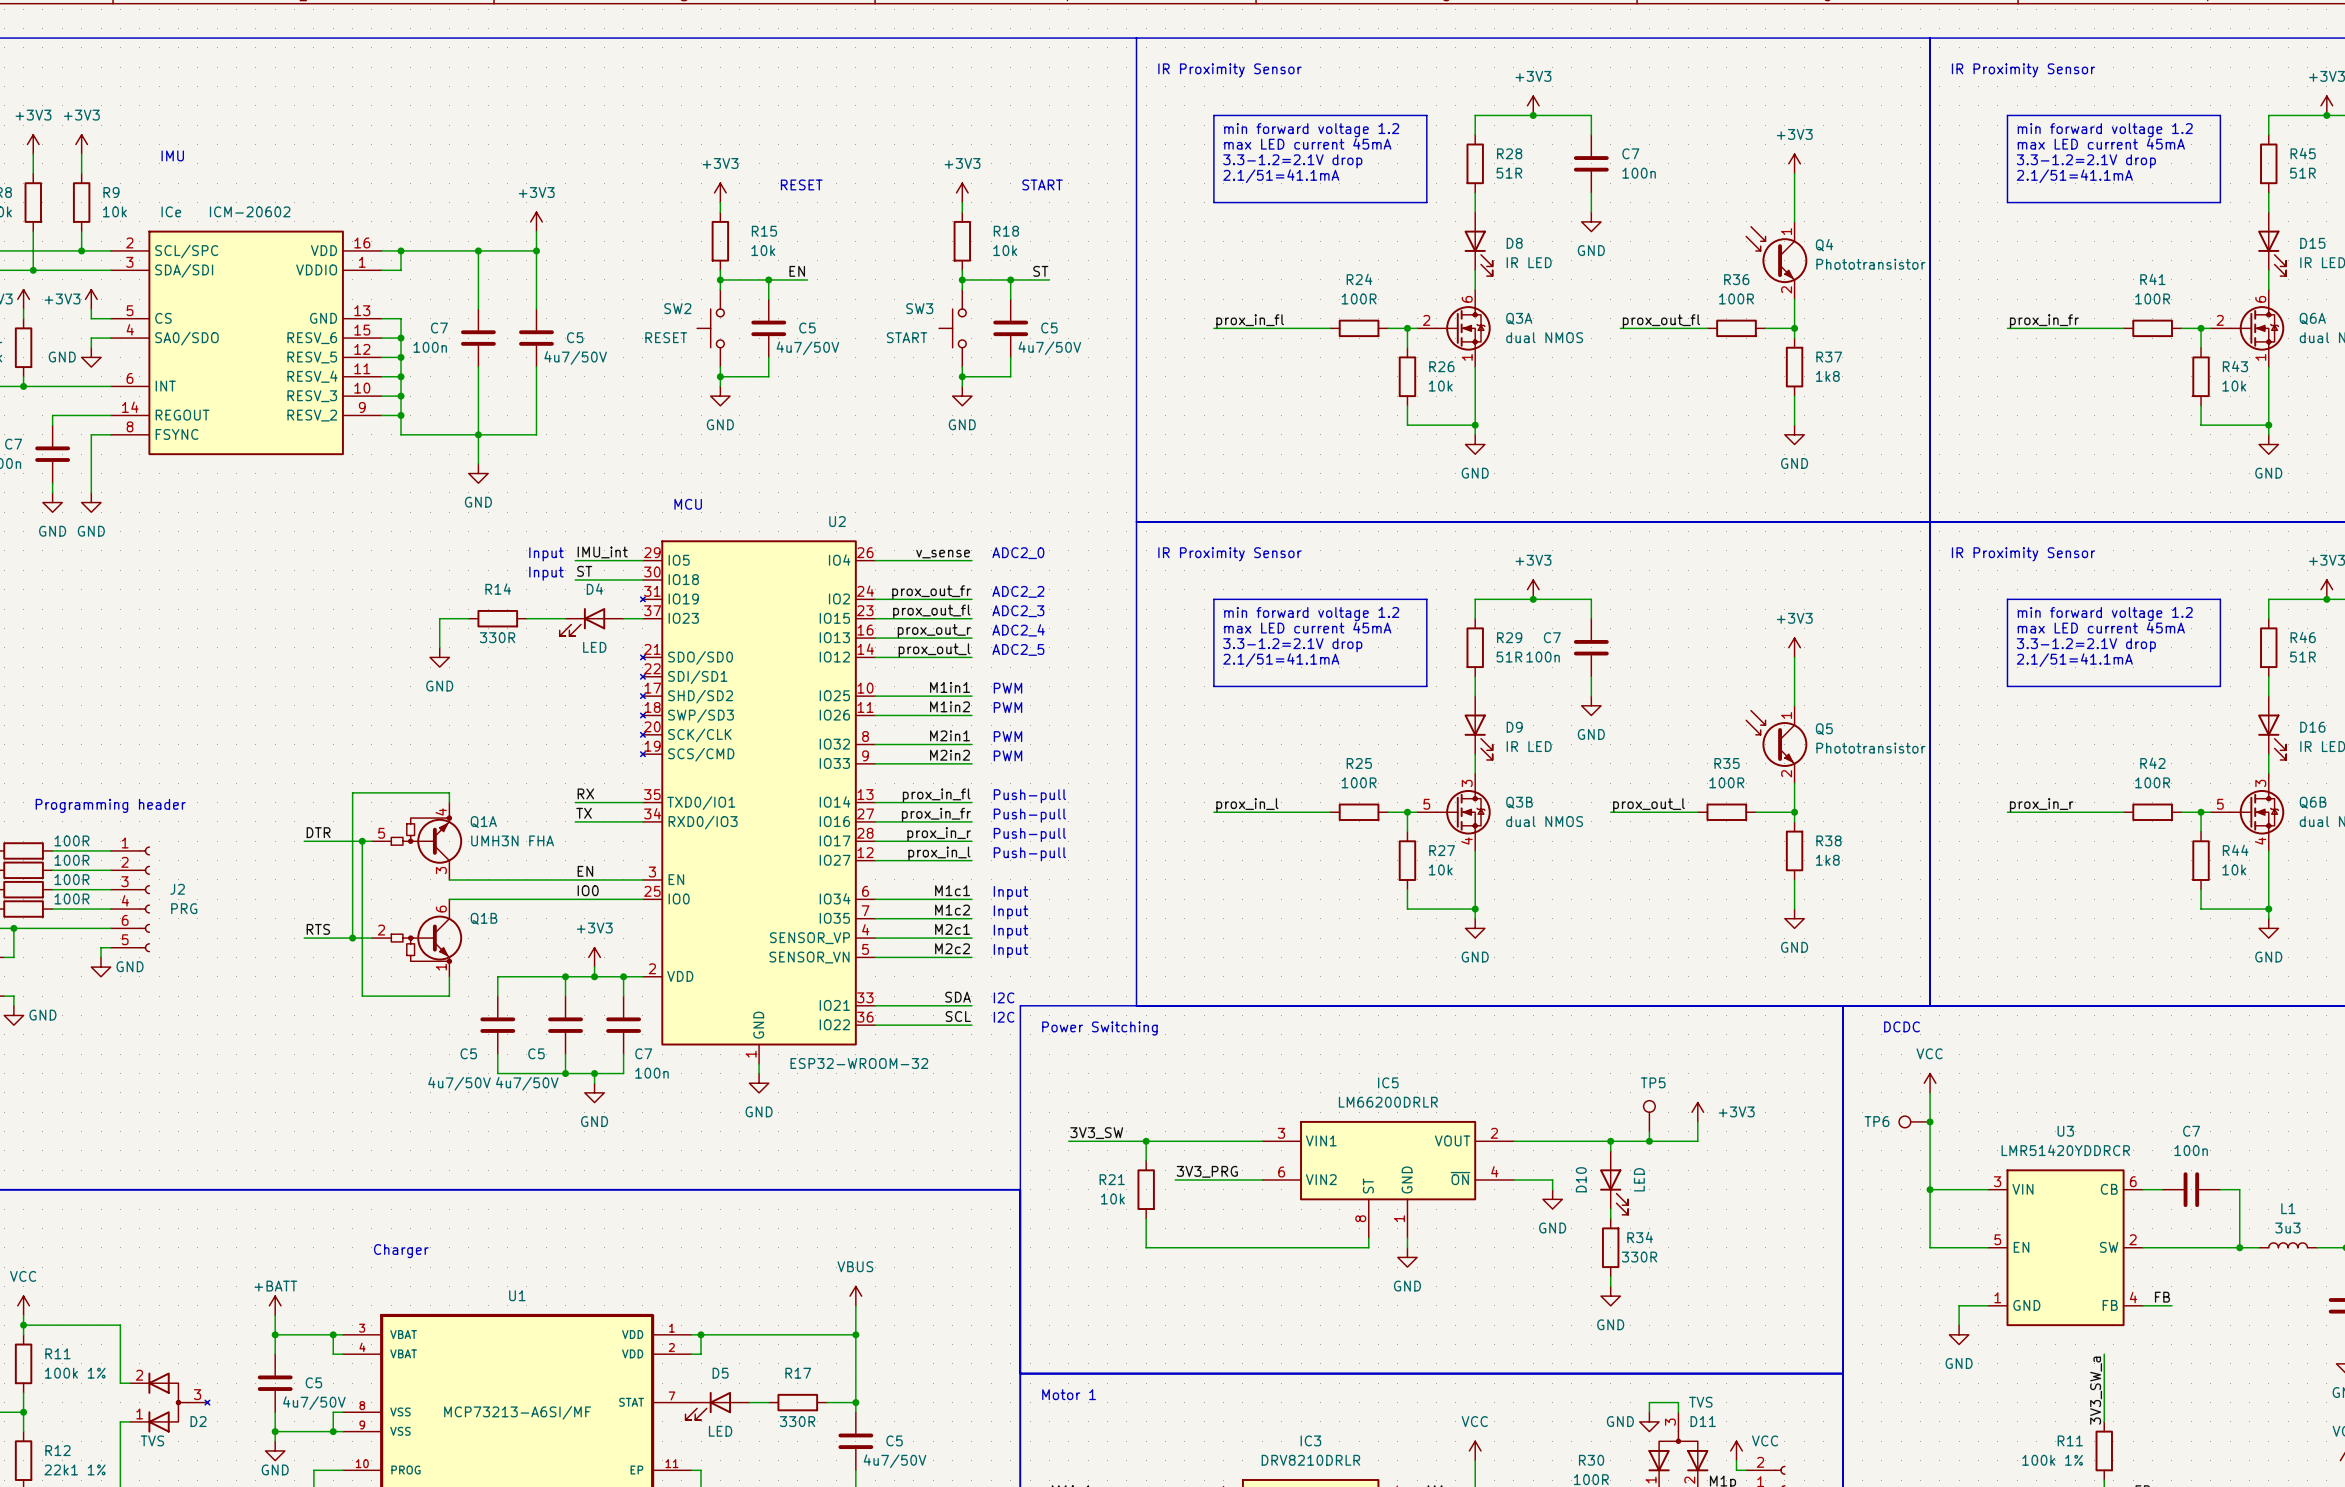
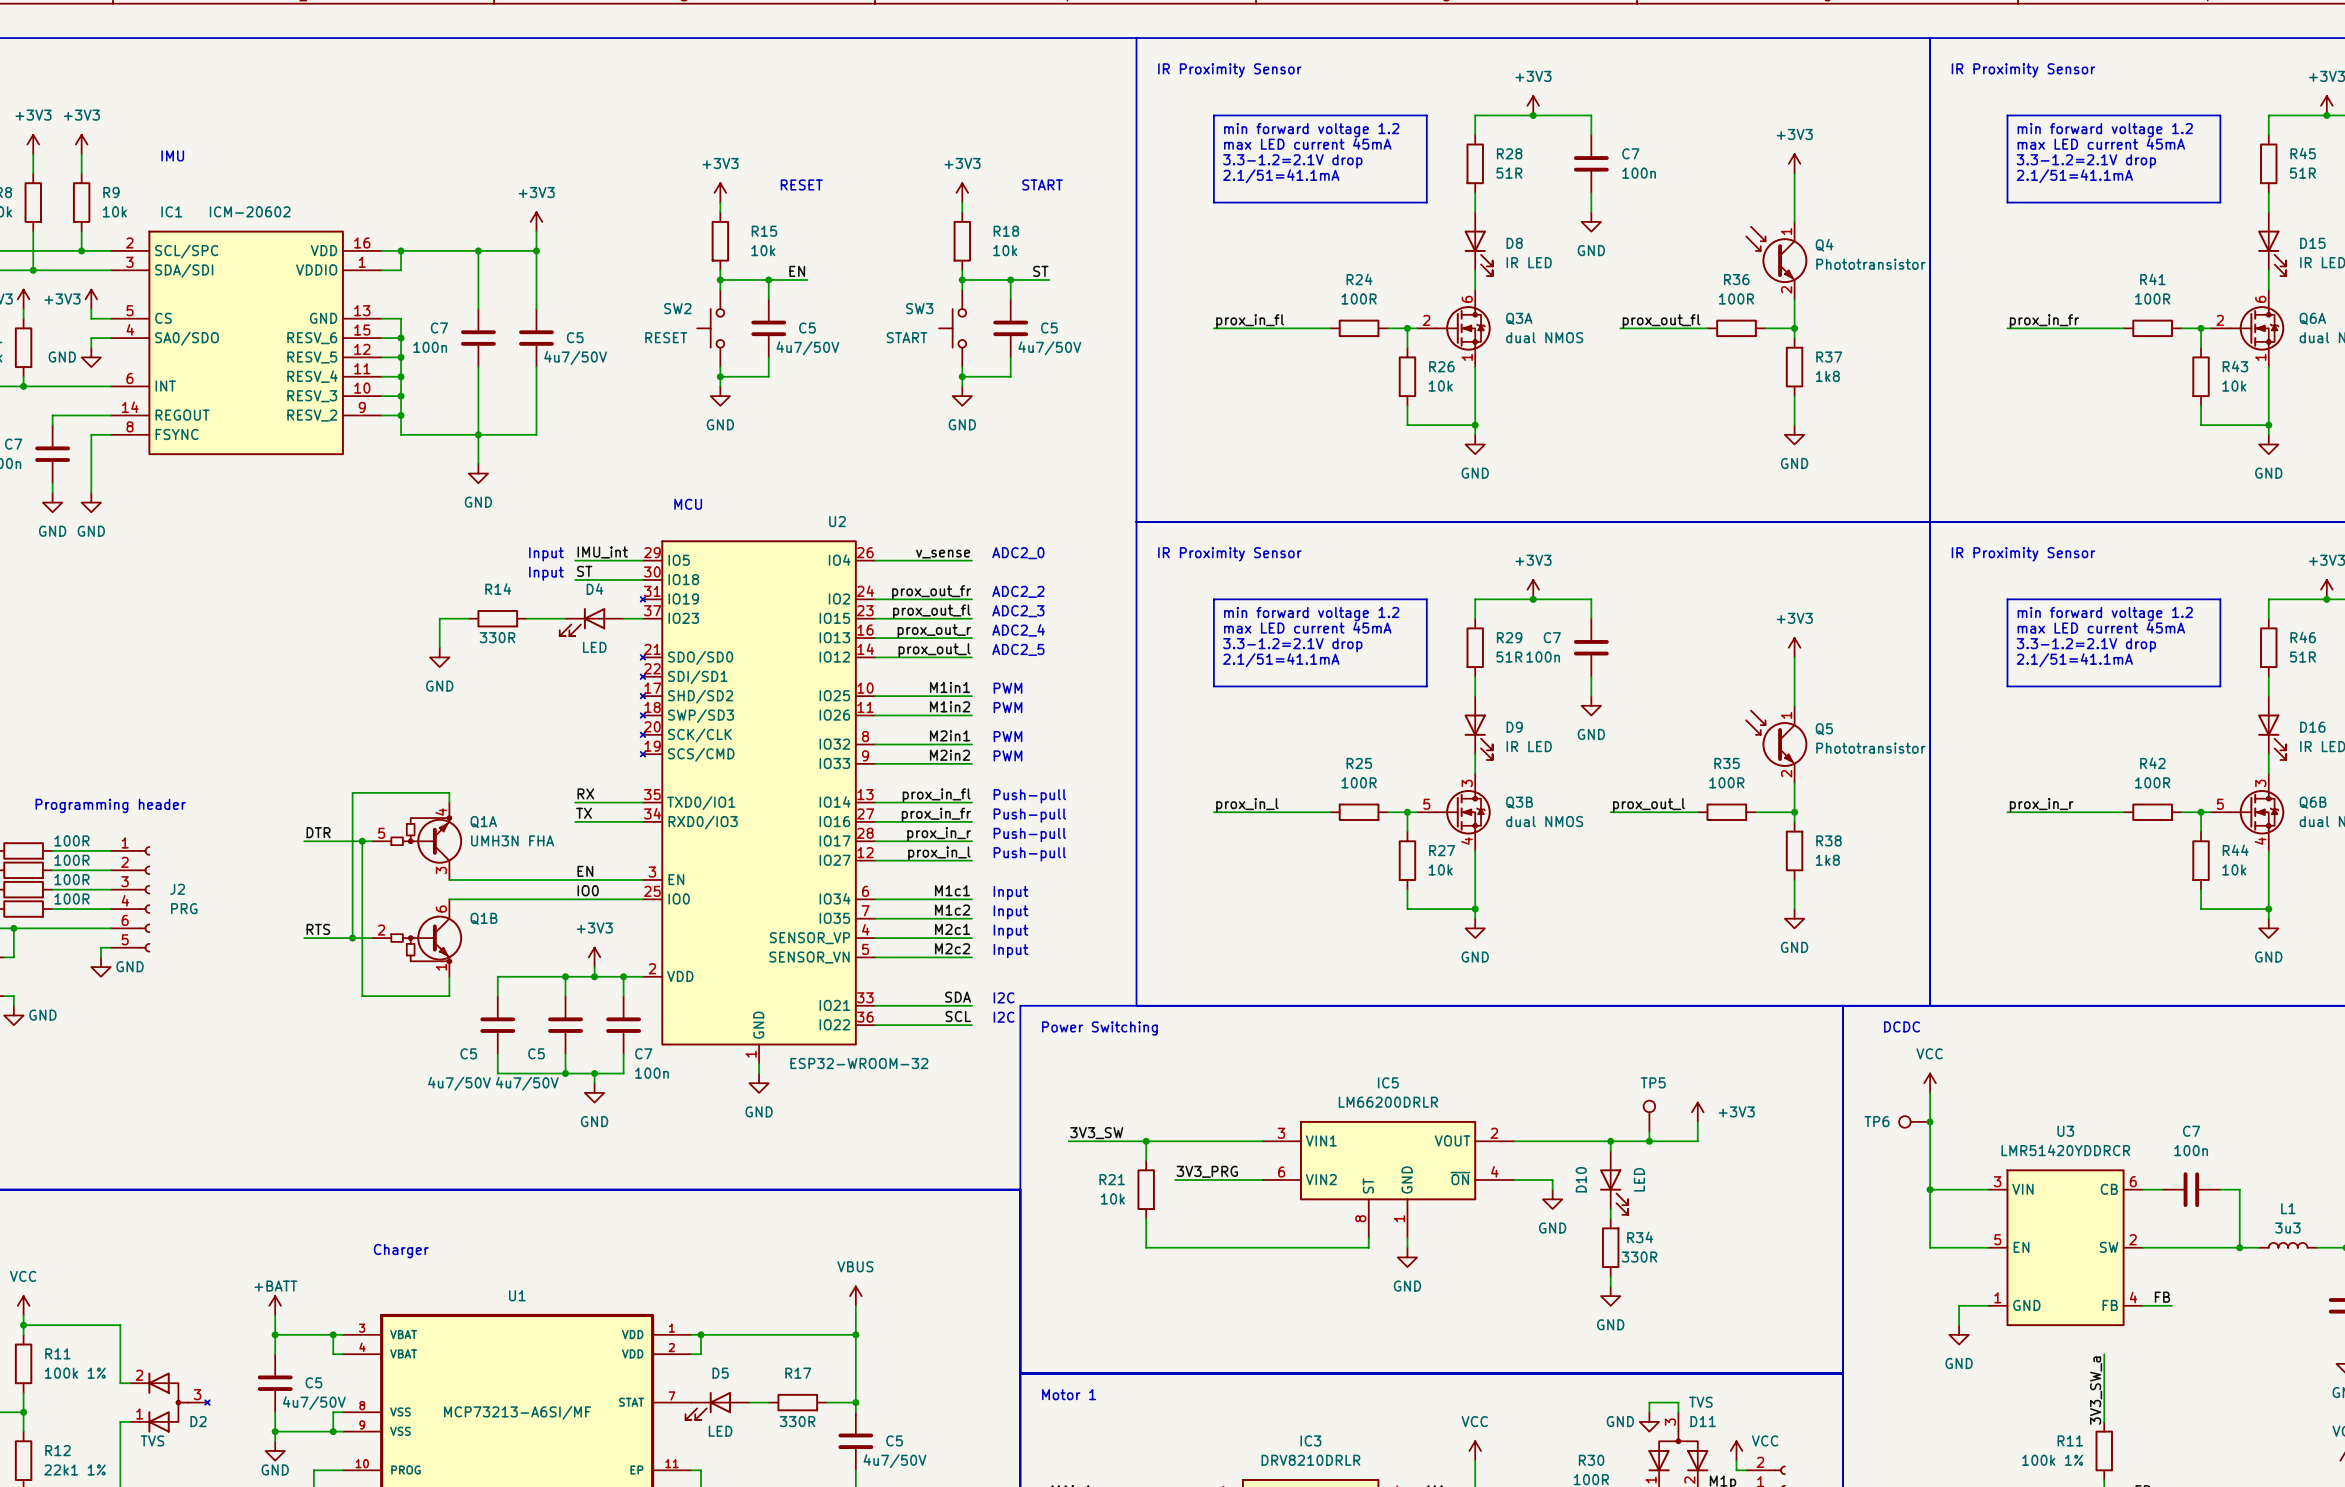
ICe name: ICe (171, 211) -> IC1 (171, 211)

